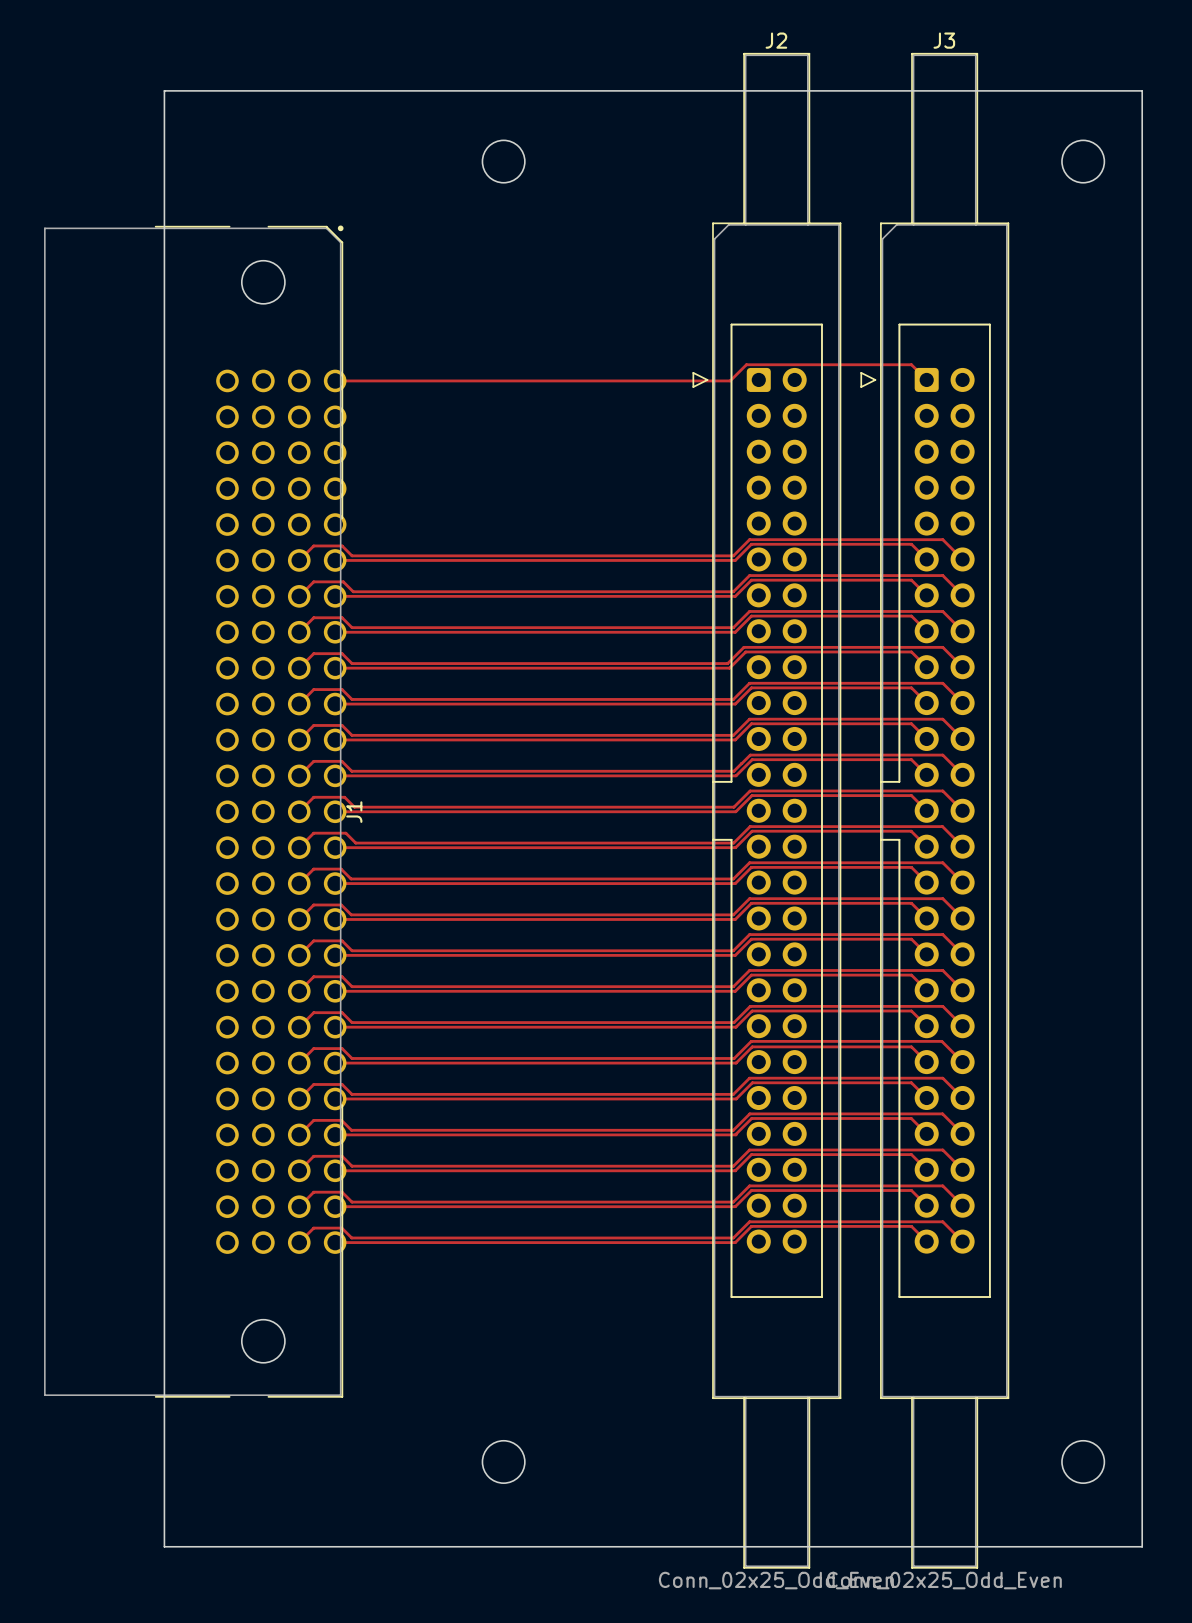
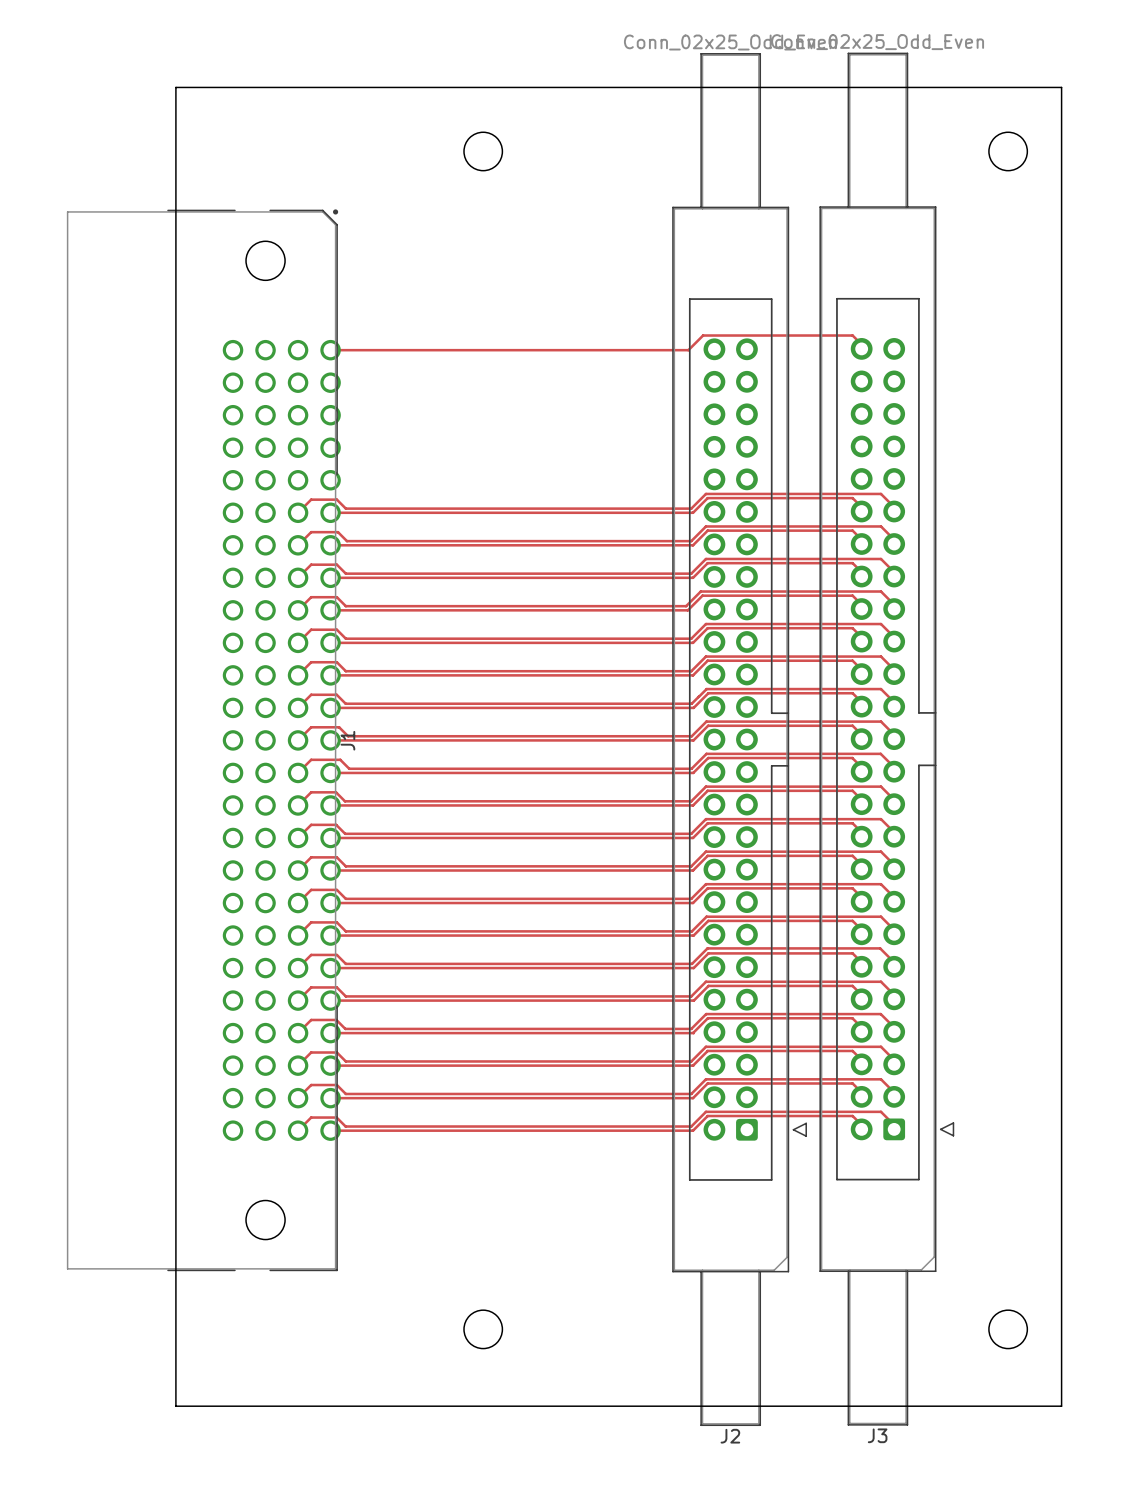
J2 rotation: 0° (766, 810) -> 180° (739, 739)
J3 rotation: 0° (934, 810) -> 180° (886, 739)

